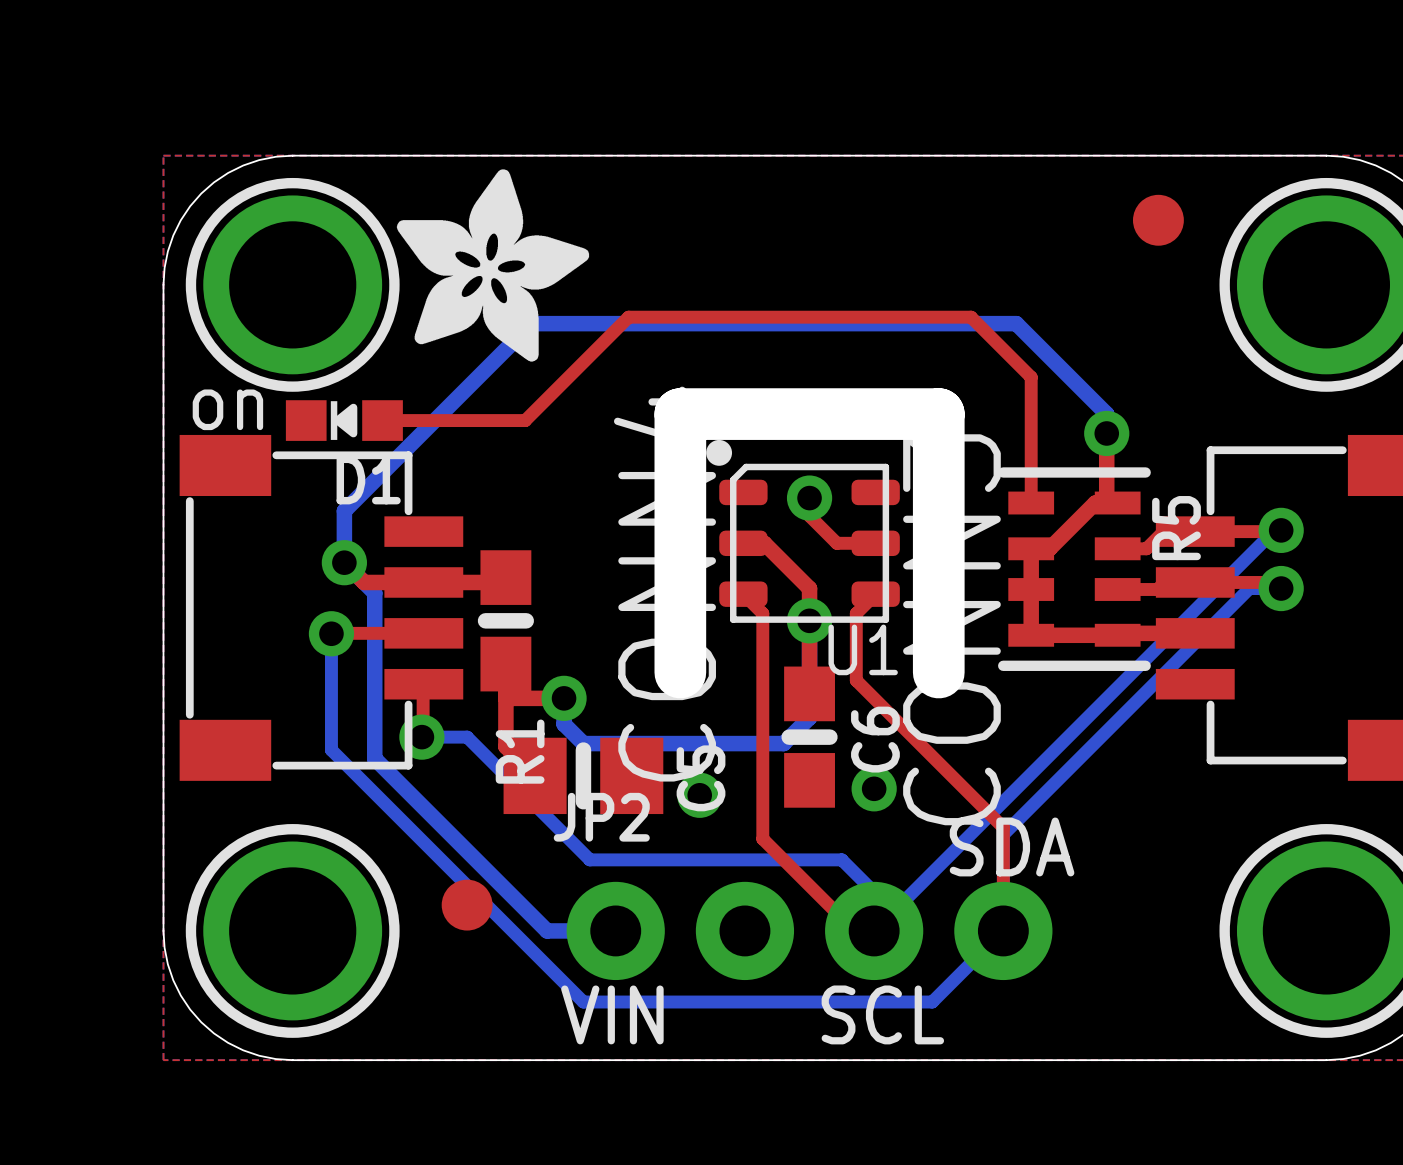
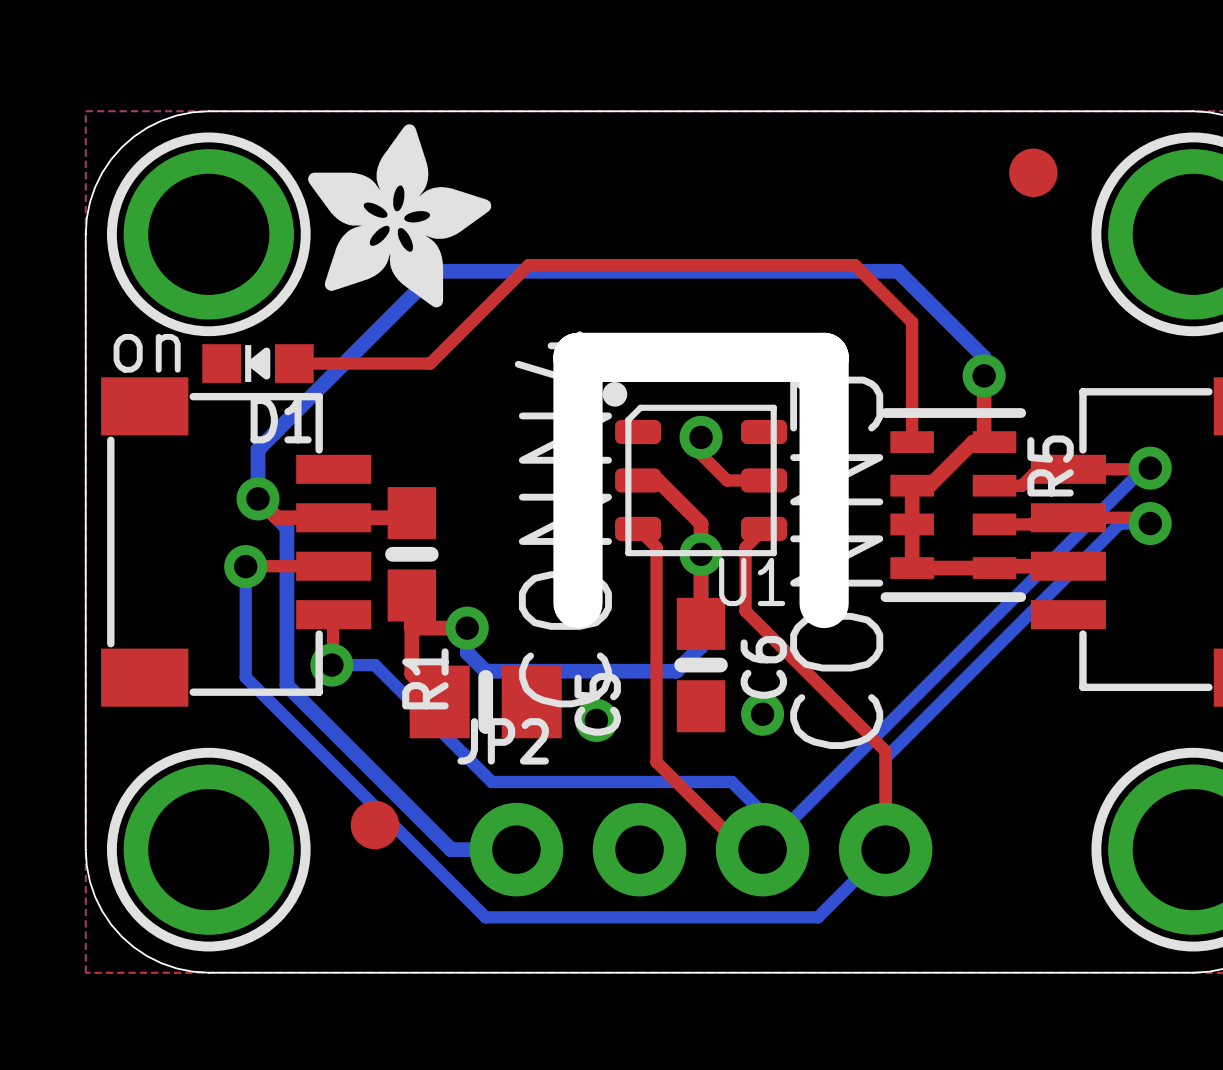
text: SDA (1012, 846) -> none
text: VIN (612, 1014) -> none
text: SCL (882, 1014) -> none

